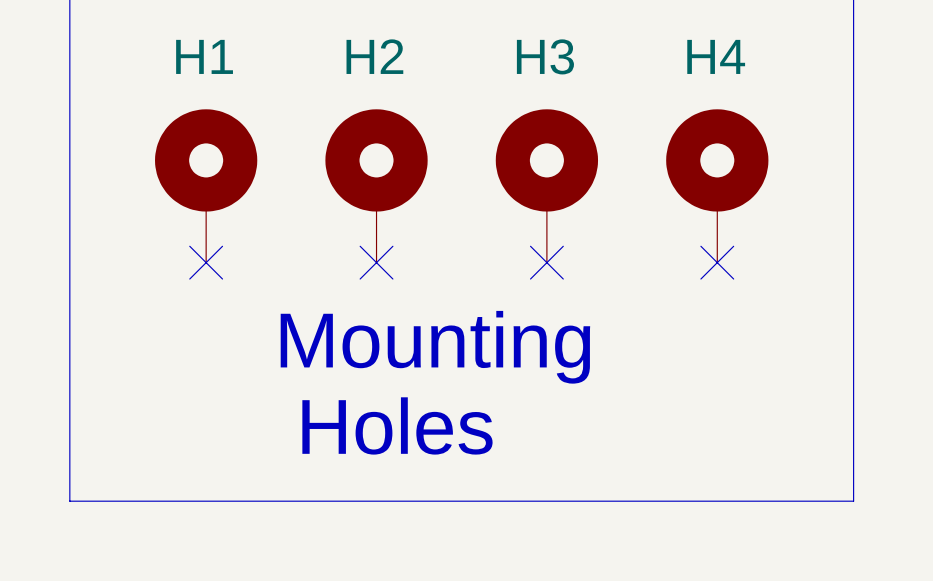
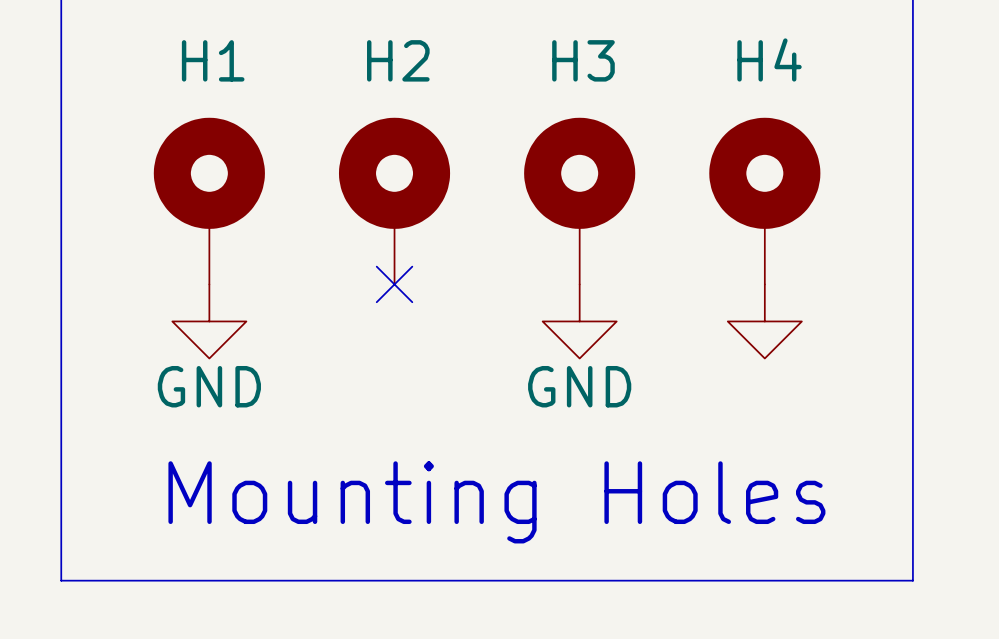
no-connect mark: (206, 262) -> none
no-connect mark: (546, 262) -> none
no-connect mark: (717, 262) -> none
power symbol: none -> GND (209, 321)
power symbol: none -> GND (579, 321)
power symbol: none -> (764, 321)
text: Mounting (435, 347) -> none
text: Holes (397, 425) -> none
text: none -> Mounting Holes (496, 502)
line: (69, 501) (853, 501) -> (61, 543) (61, 580) (912, 580) (912, 543)

